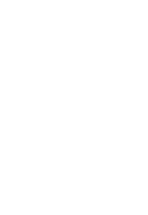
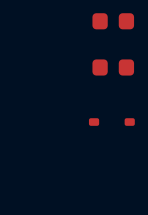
part: none -> (113, 21)
part: none -> (113, 67)
part: none -> (111, 122)

